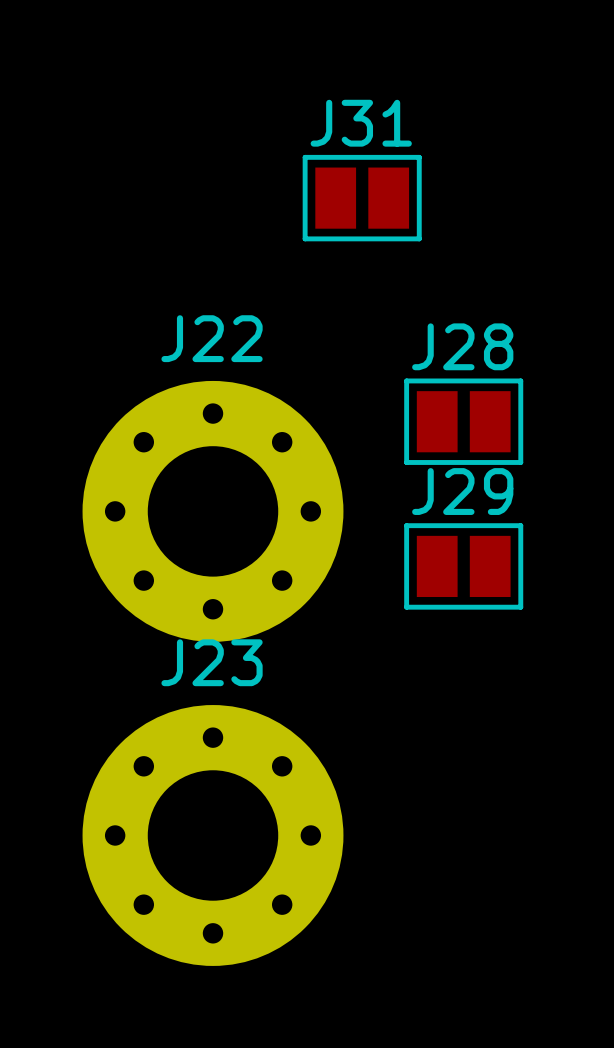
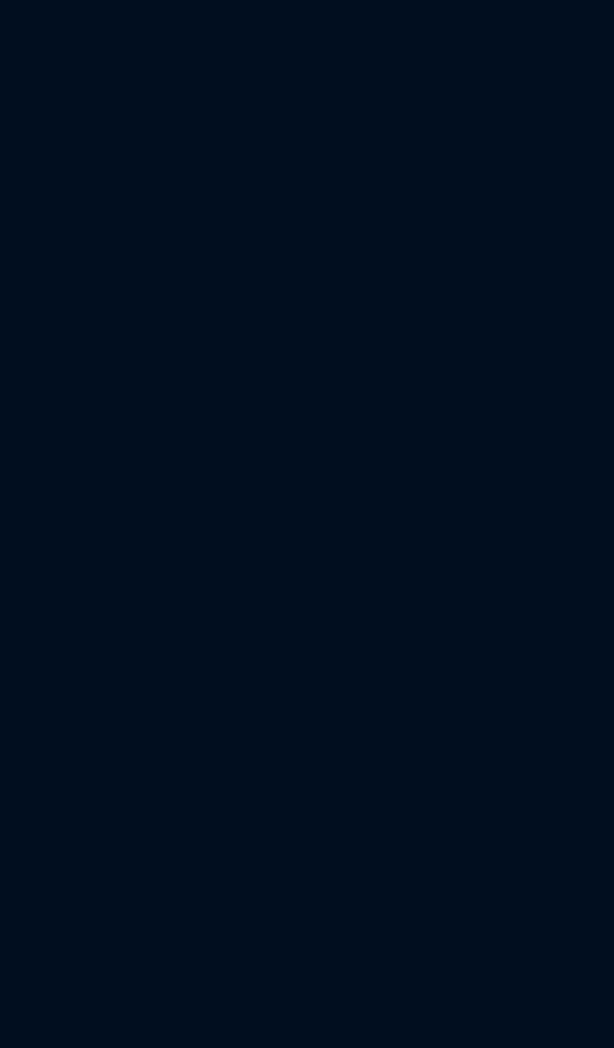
J31: (362, 198) -> none
J28: (463, 421) -> none
J22: (213, 511) -> none
J29: (463, 566) -> none
J23: (213, 835) -> none

